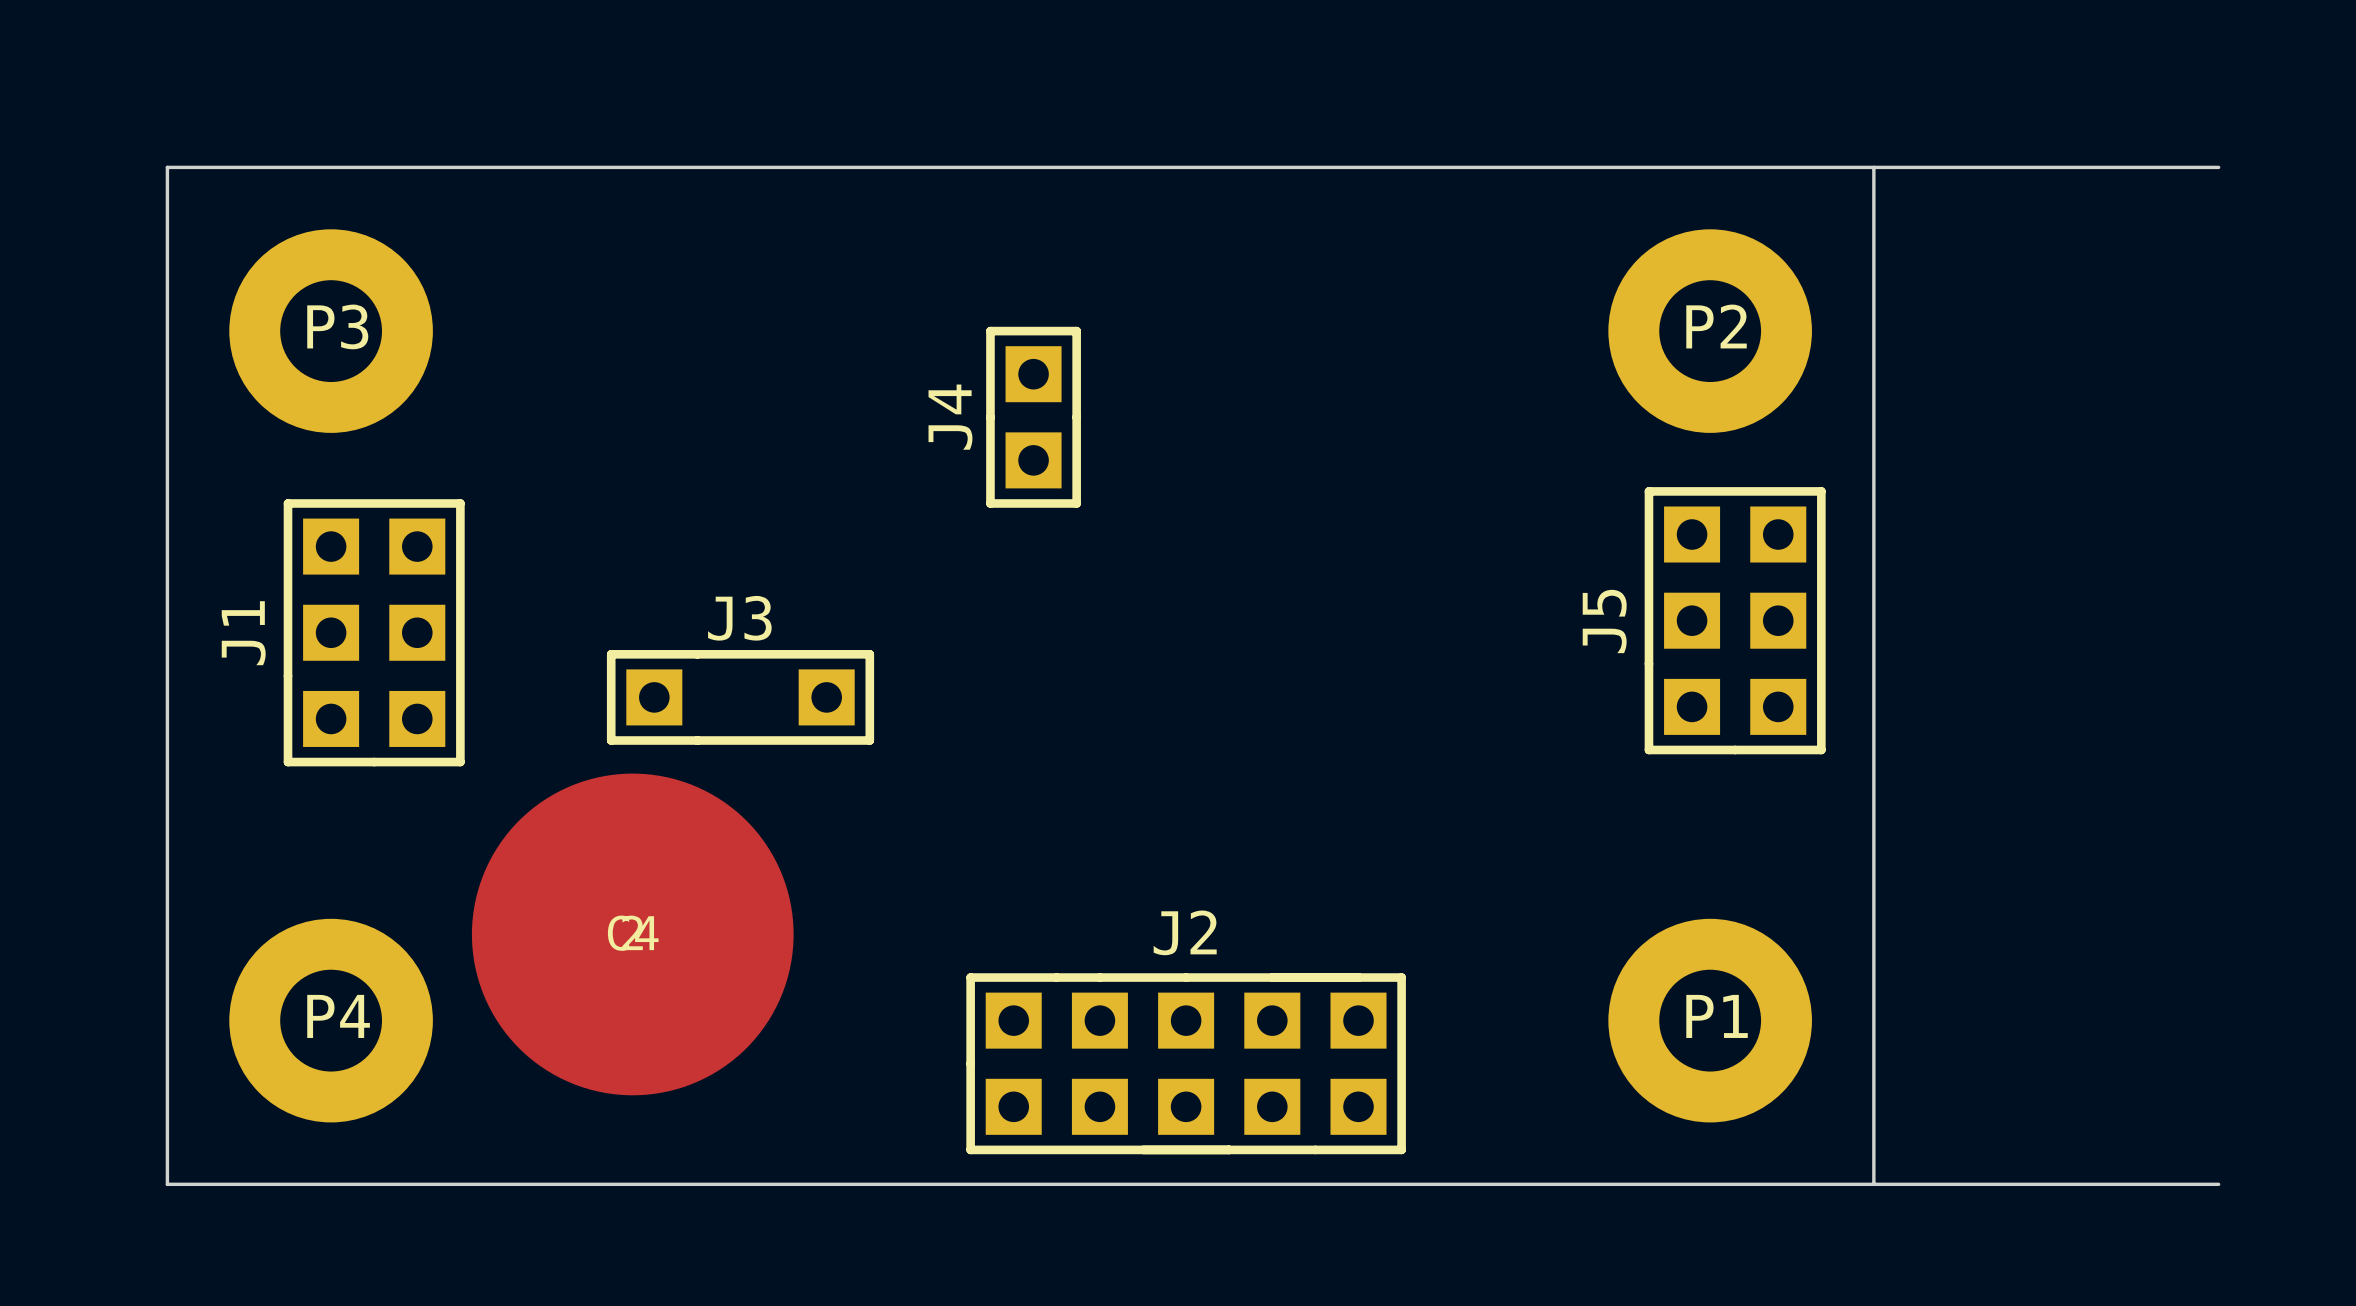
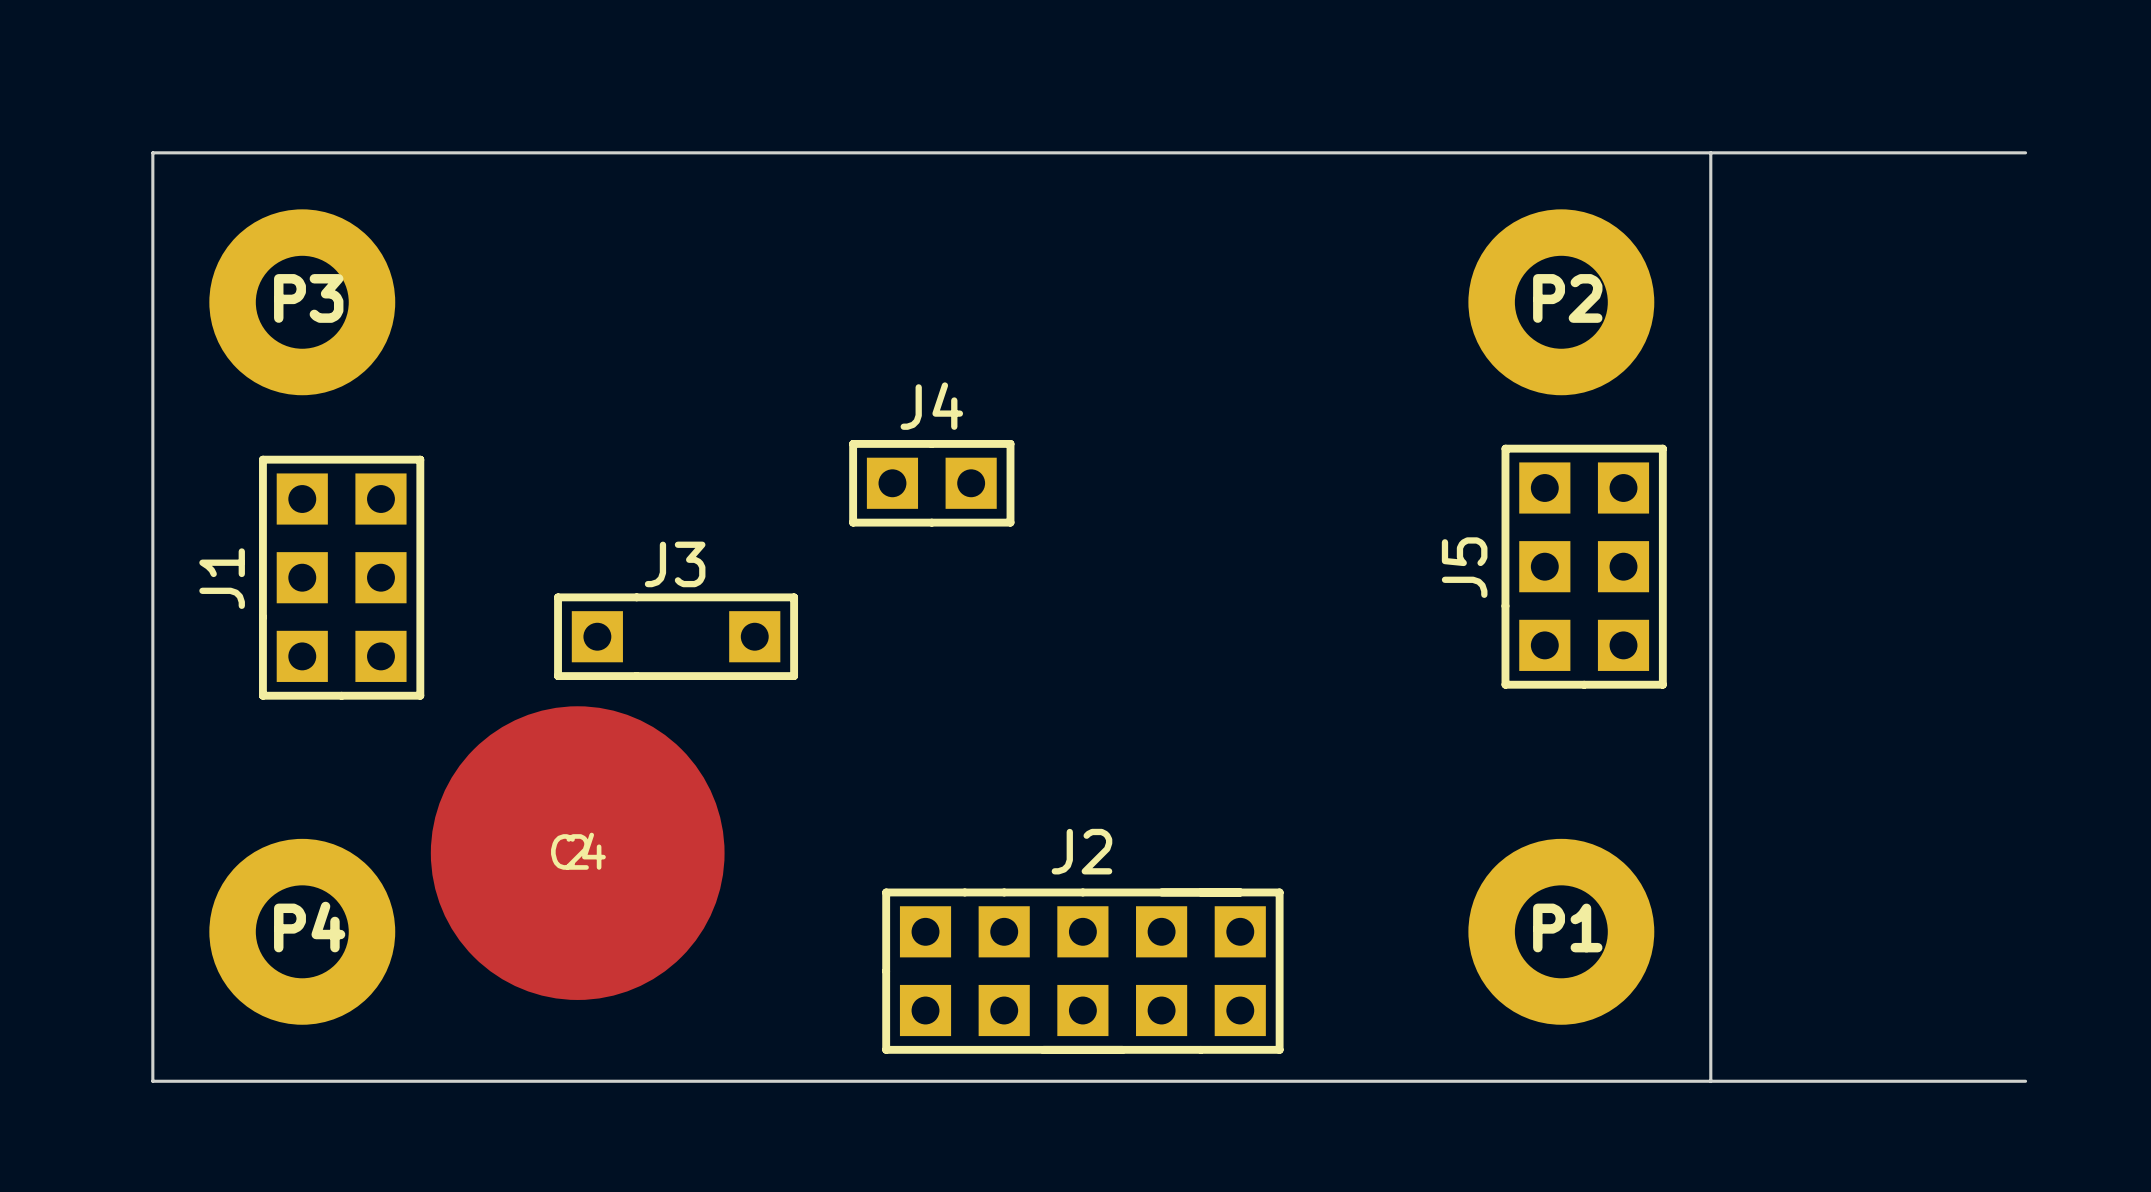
J4 rotation: 0° (1033, 417) -> 90° clockwise (931, 483)
J4 position: (1033, 417) -> (931, 483)

